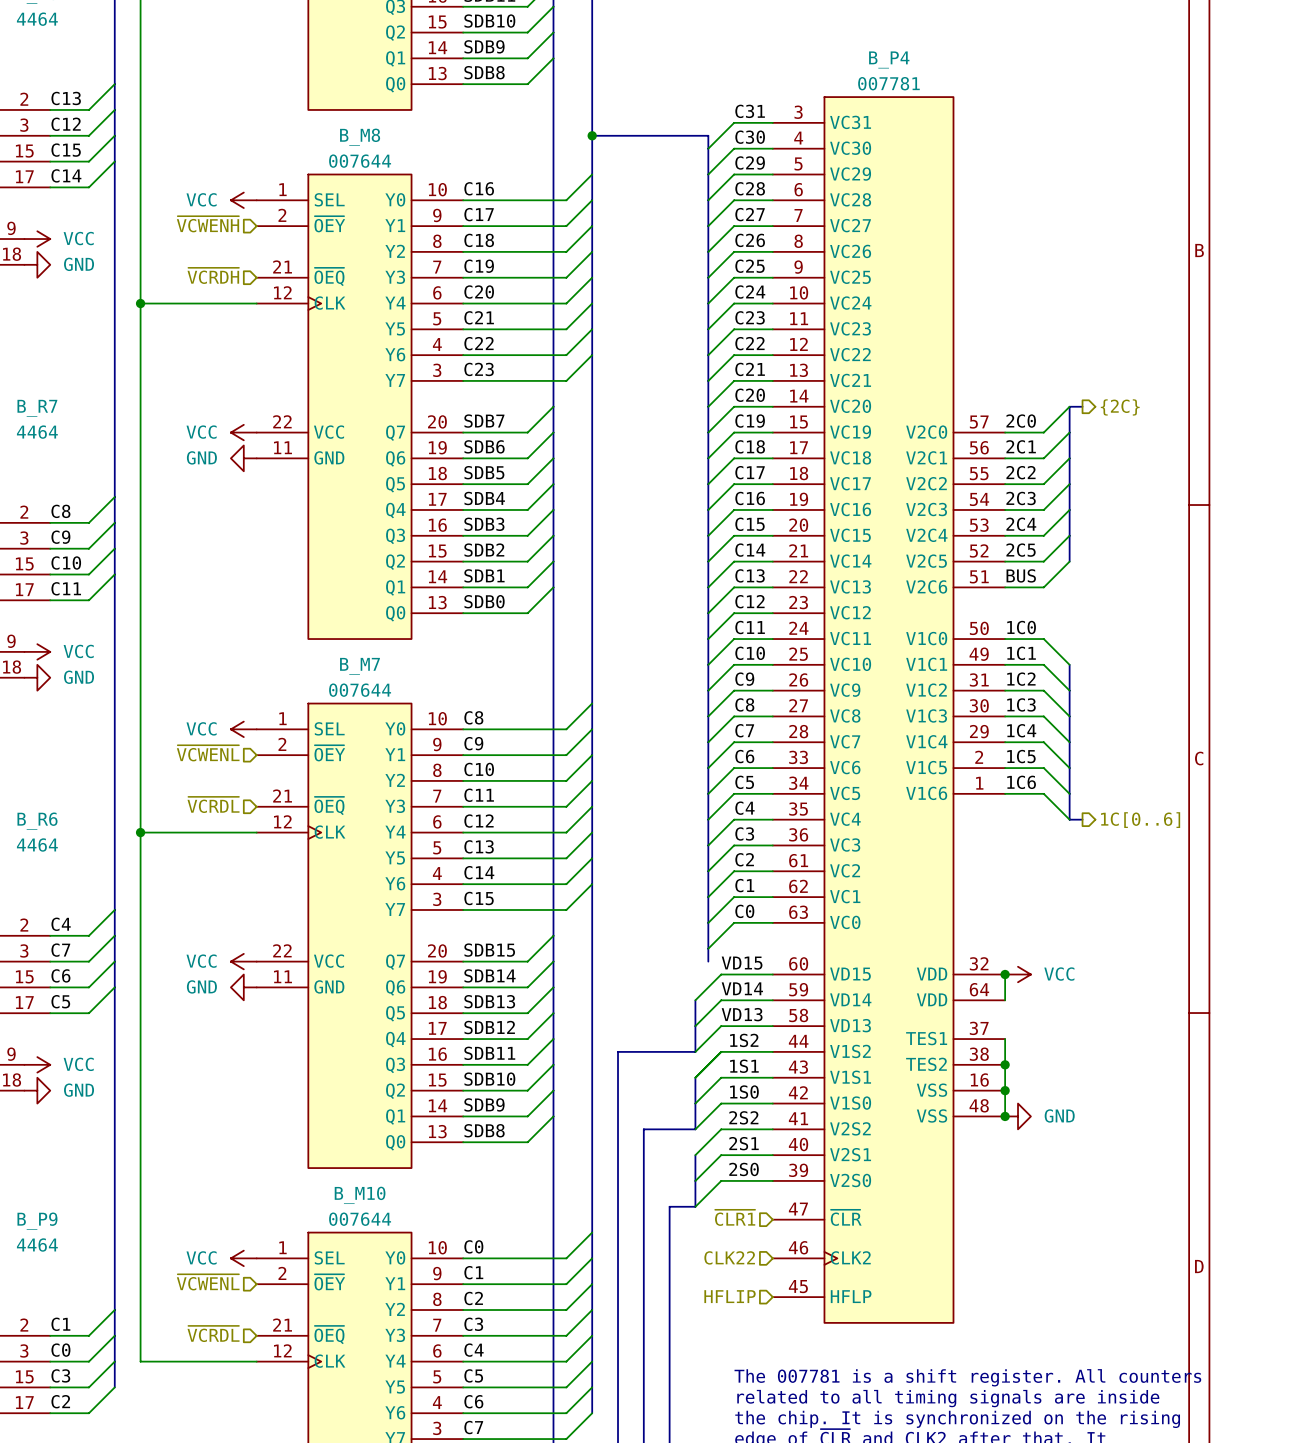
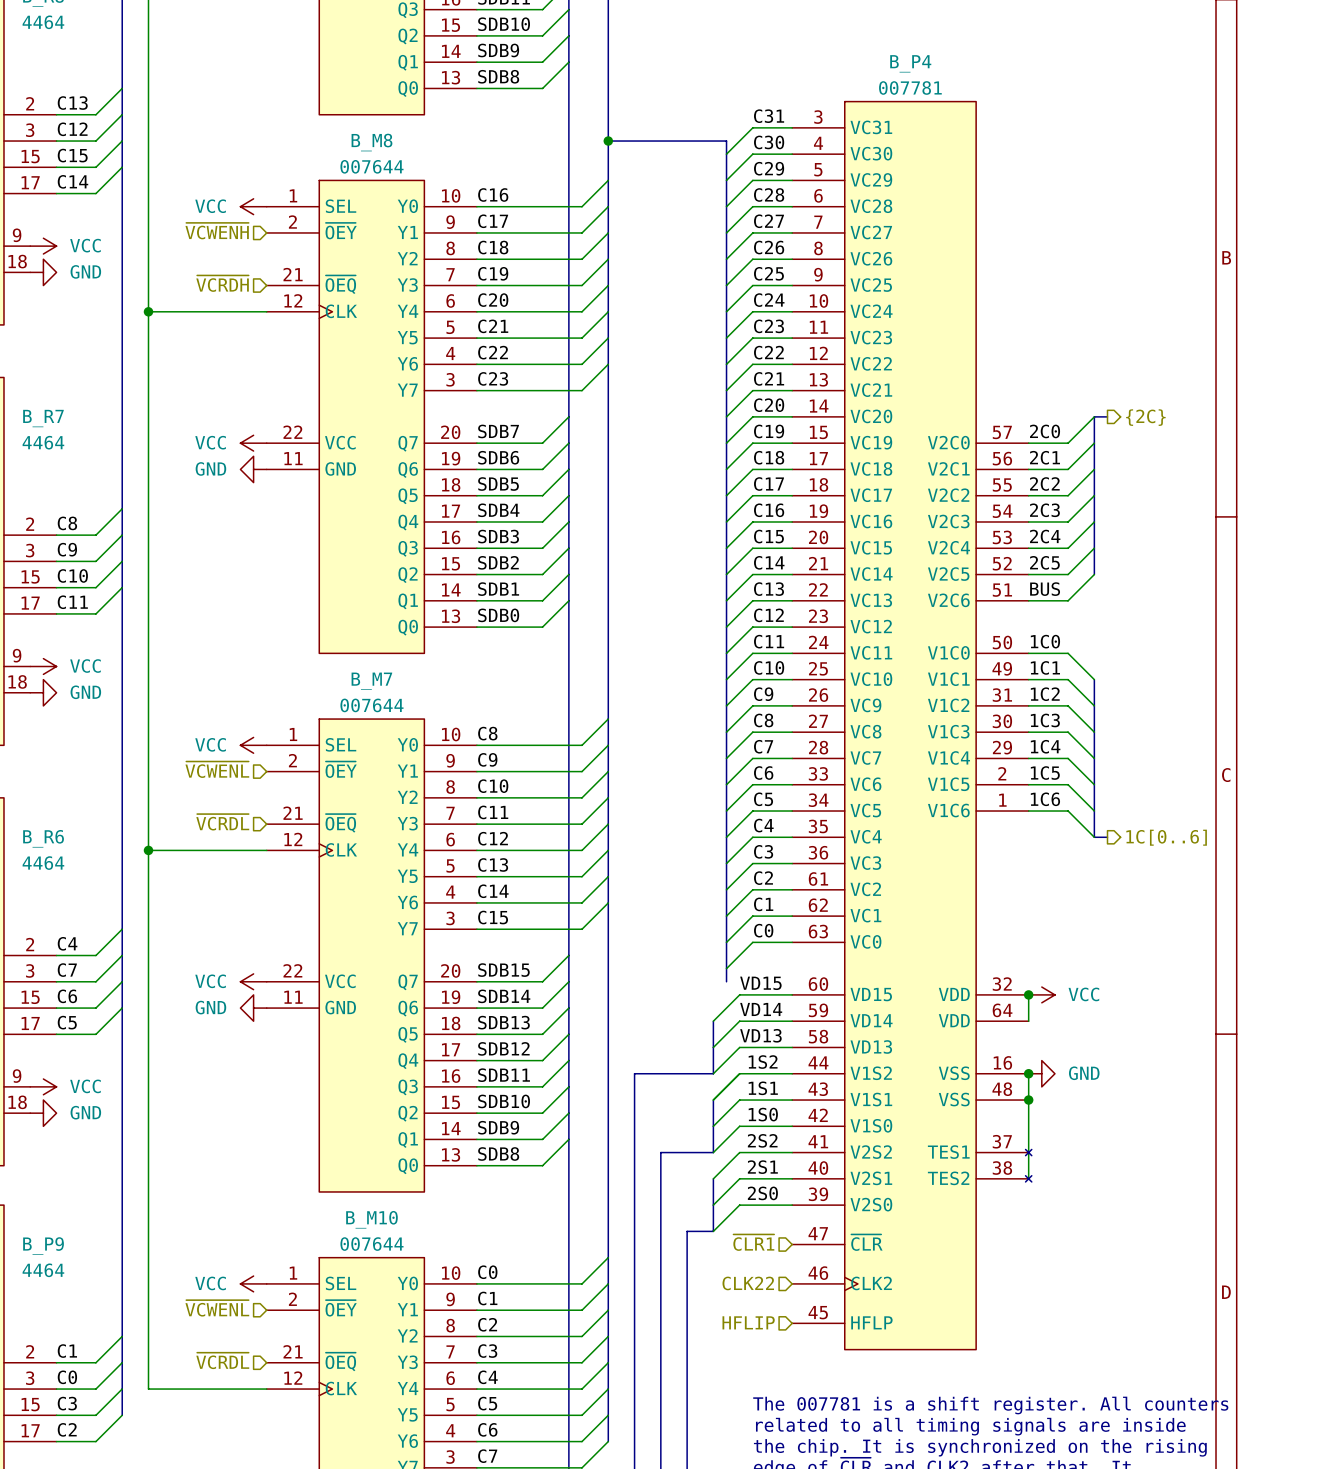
B_P4 symbol: [772, 97, 1006, 1323] -> [792, 101, 1032, 1350]
wire: (1005, 1039) (1005, 1051) -> none
junction: none -> (1028, 1073)
junction: (1005, 1064) -> none
junction: none -> (1028, 1100)
junction: (1005, 1090) -> none
wire: none -> (1028, 1139) (1028, 1178)
junction: (1005, 1116) -> none
power symbol position: GND (1018, 1116) -> GND (1041, 1073)

